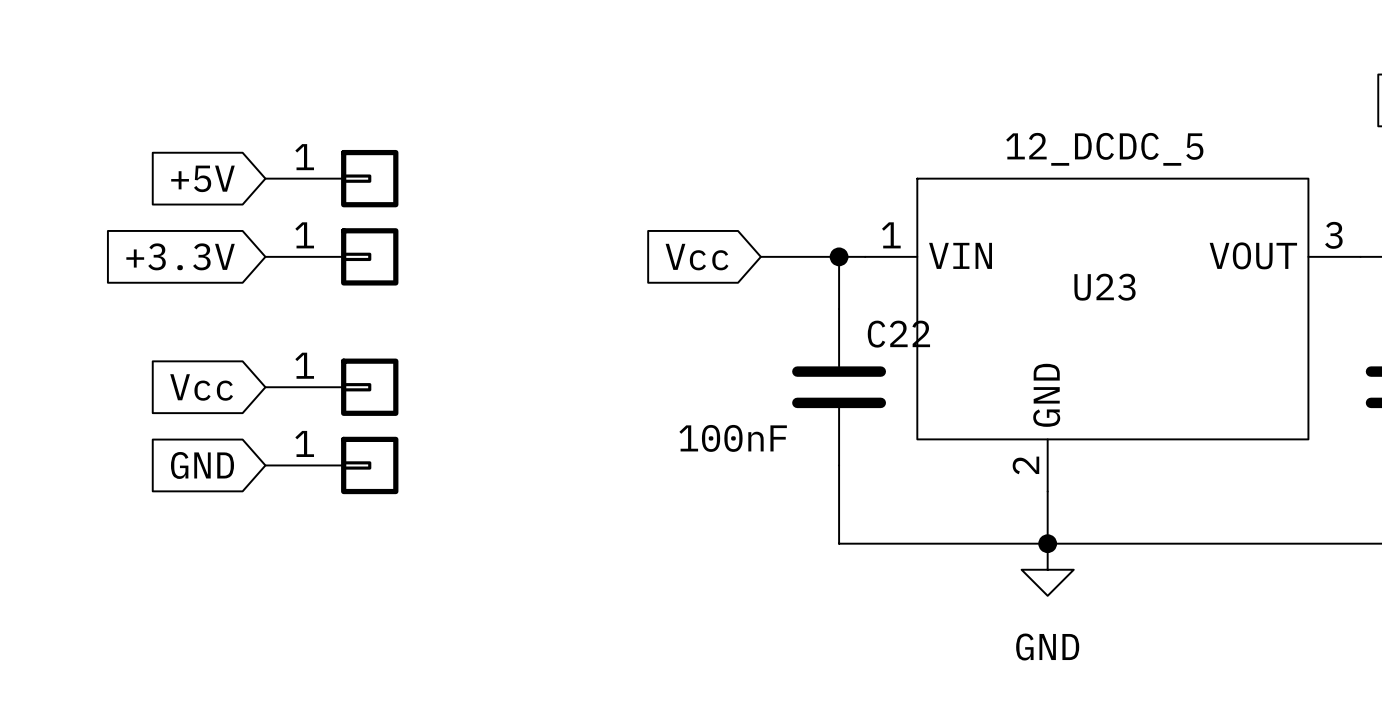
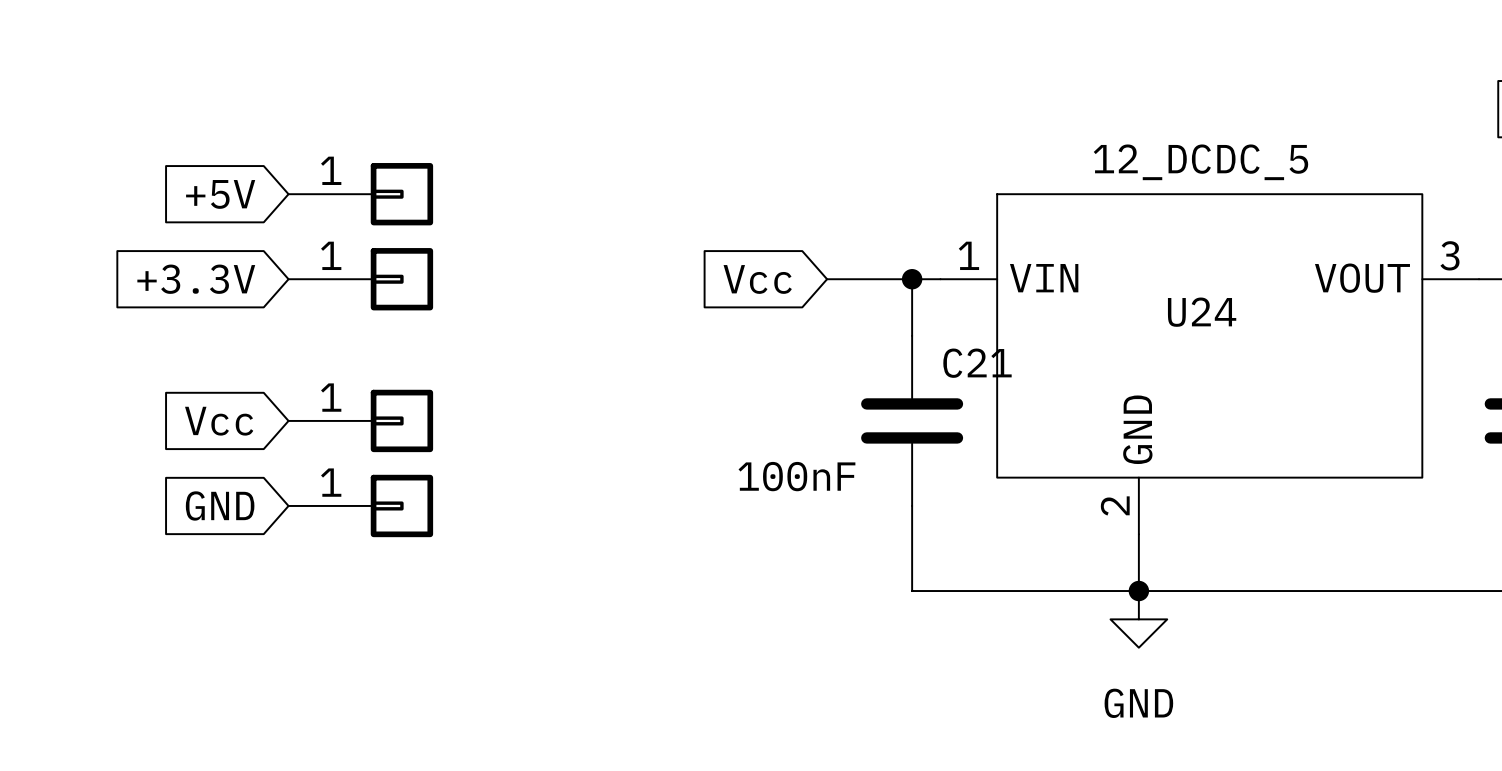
U23 name: U23 (1105, 287) -> U24 (1202, 312)
C22 name: C22 (898, 334) -> C21 (977, 363)

